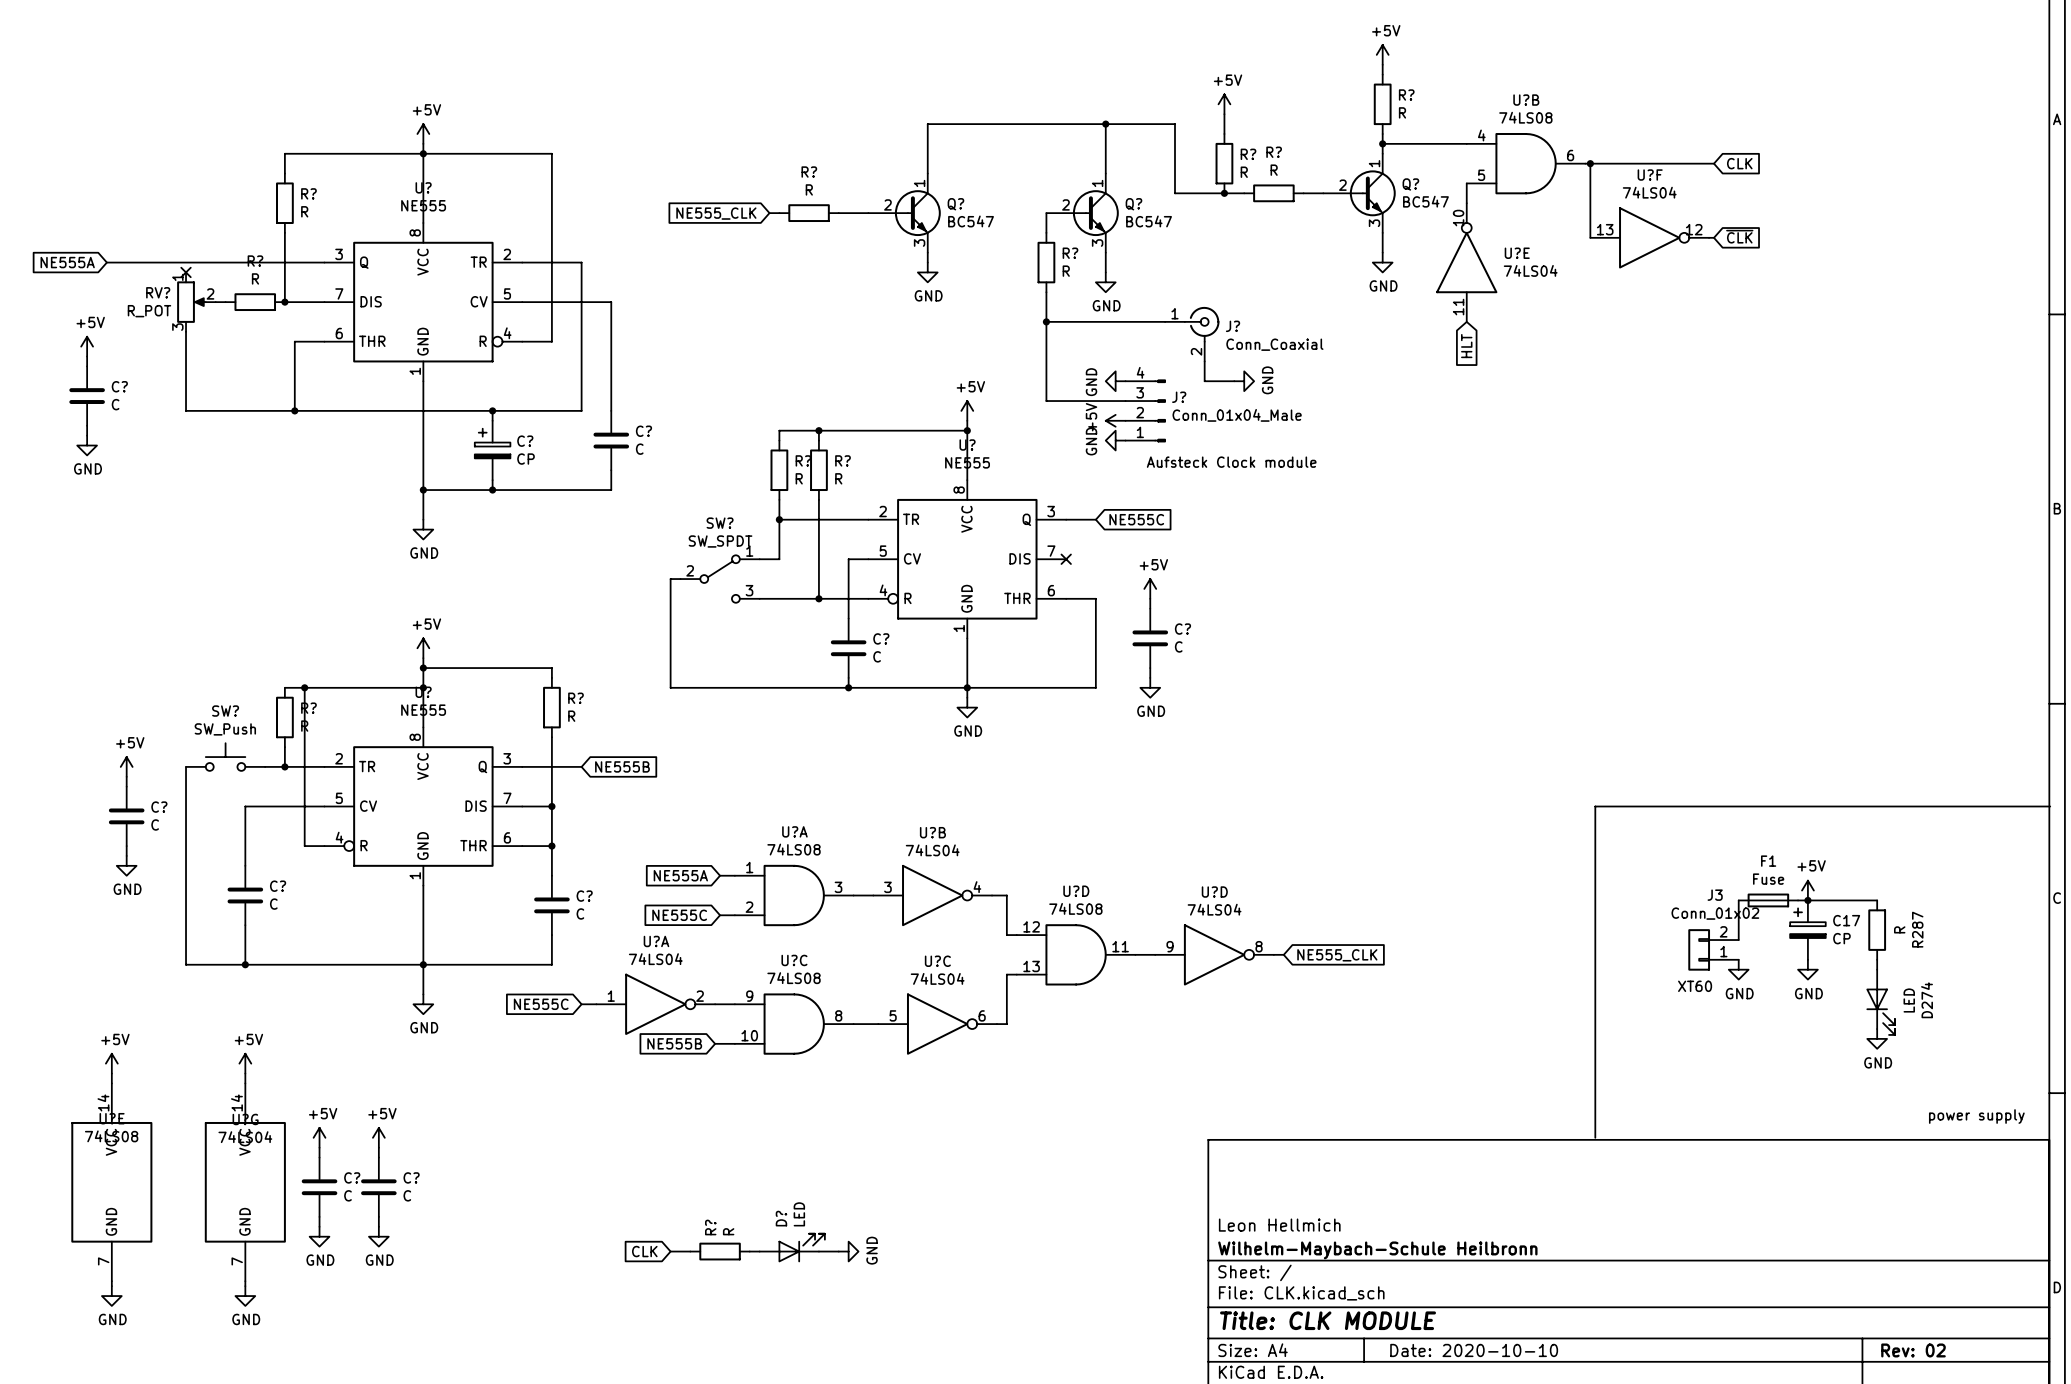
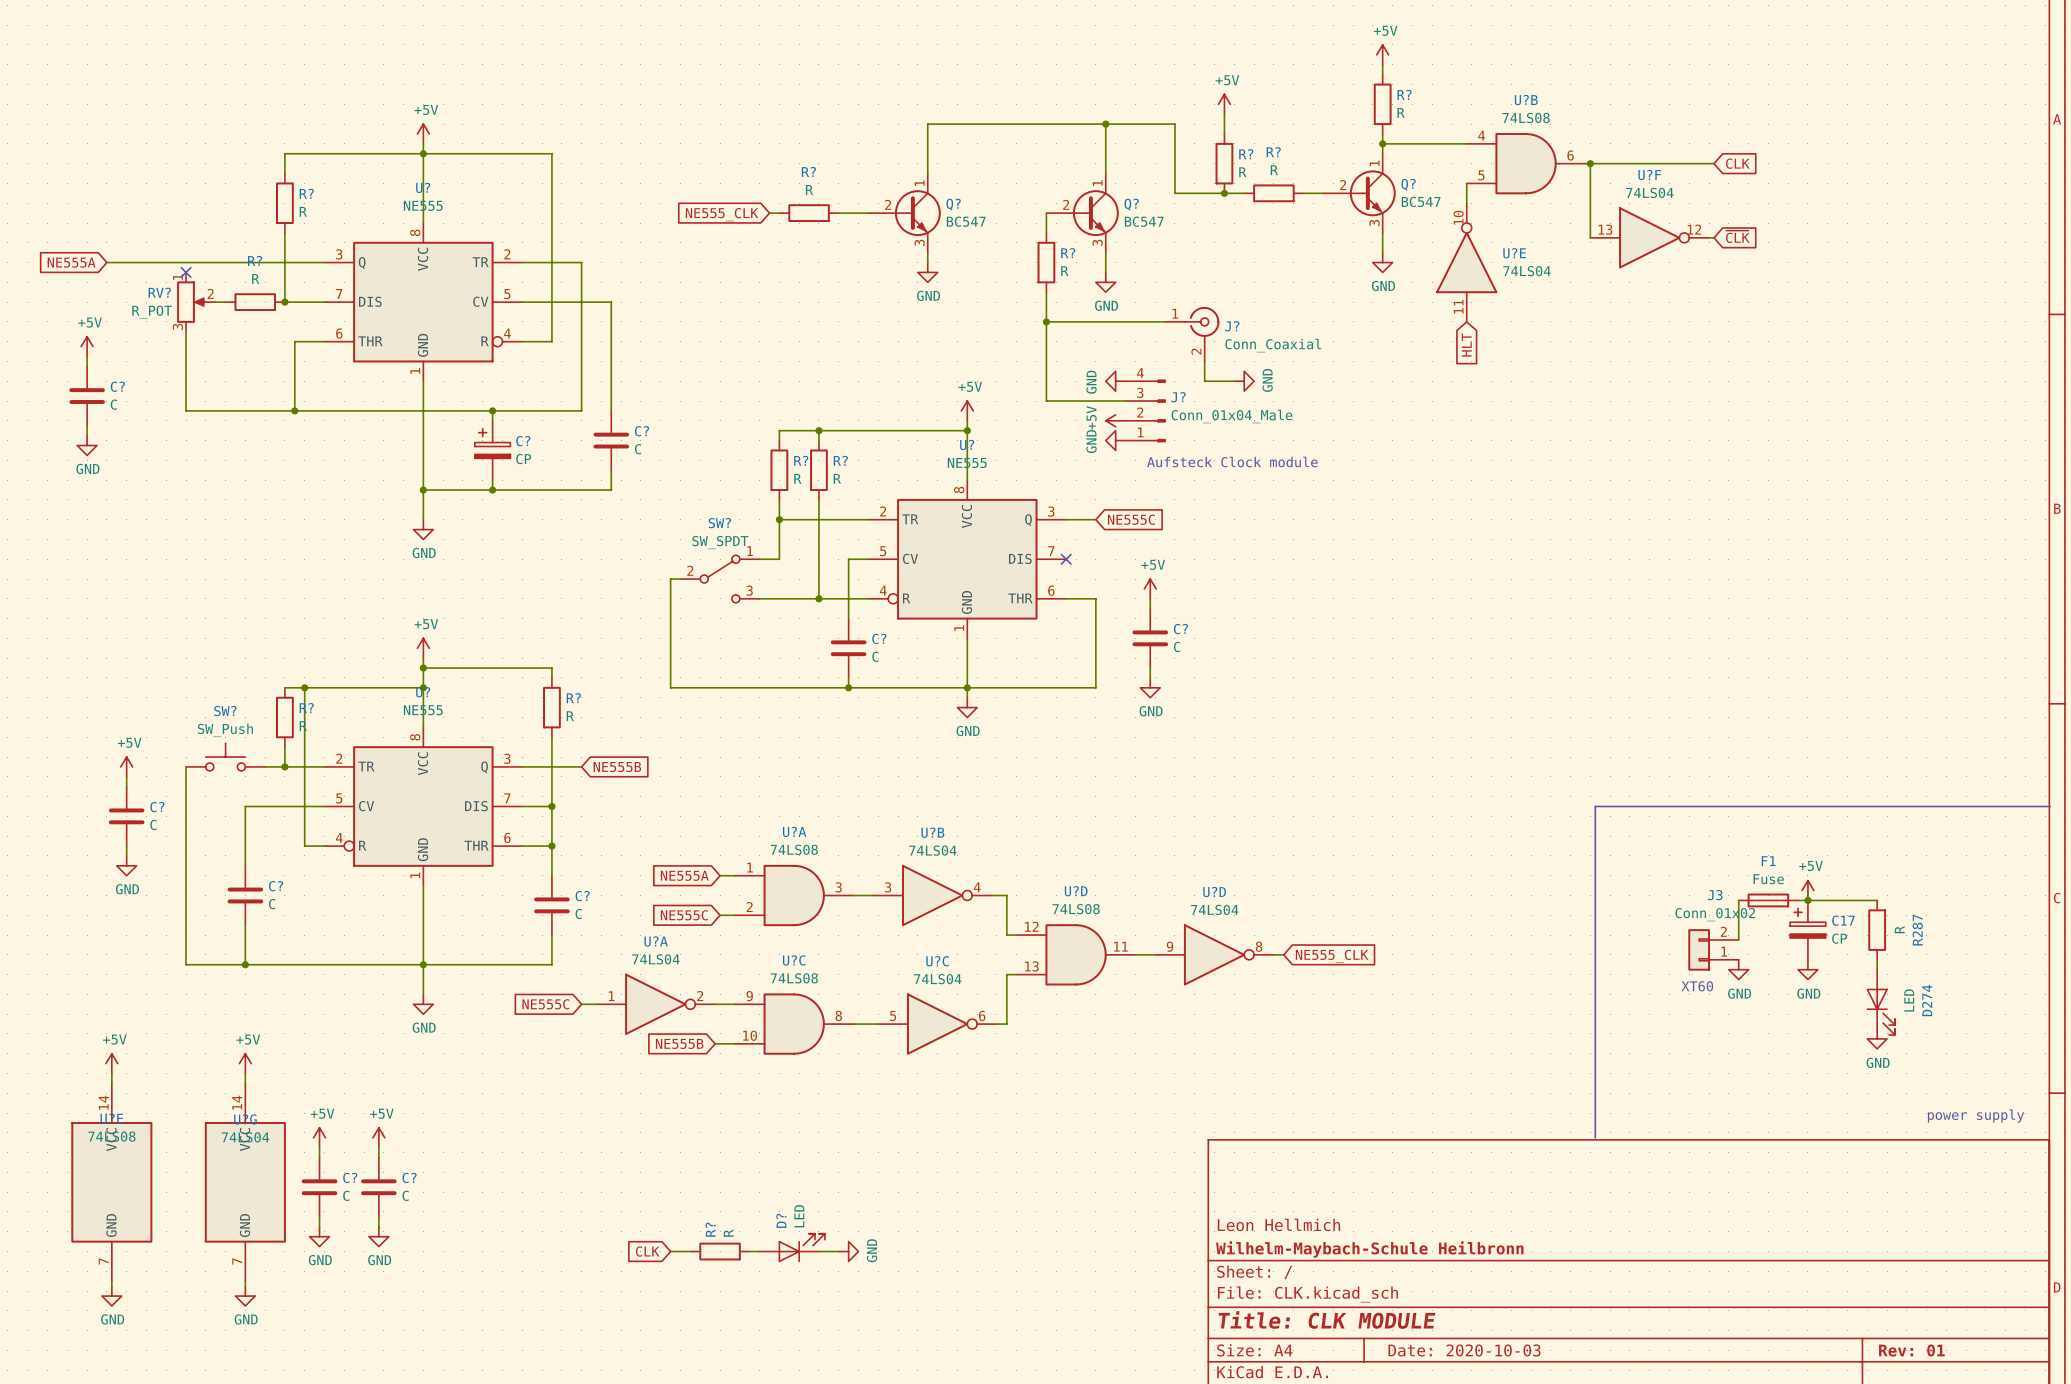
title block: Date: 2020-10-10 (1474, 1350) -> Date: 2020-10-03 (1464, 1350)
title block: Rev: 02 (1913, 1350) -> Rev: 01 (1911, 1350)

